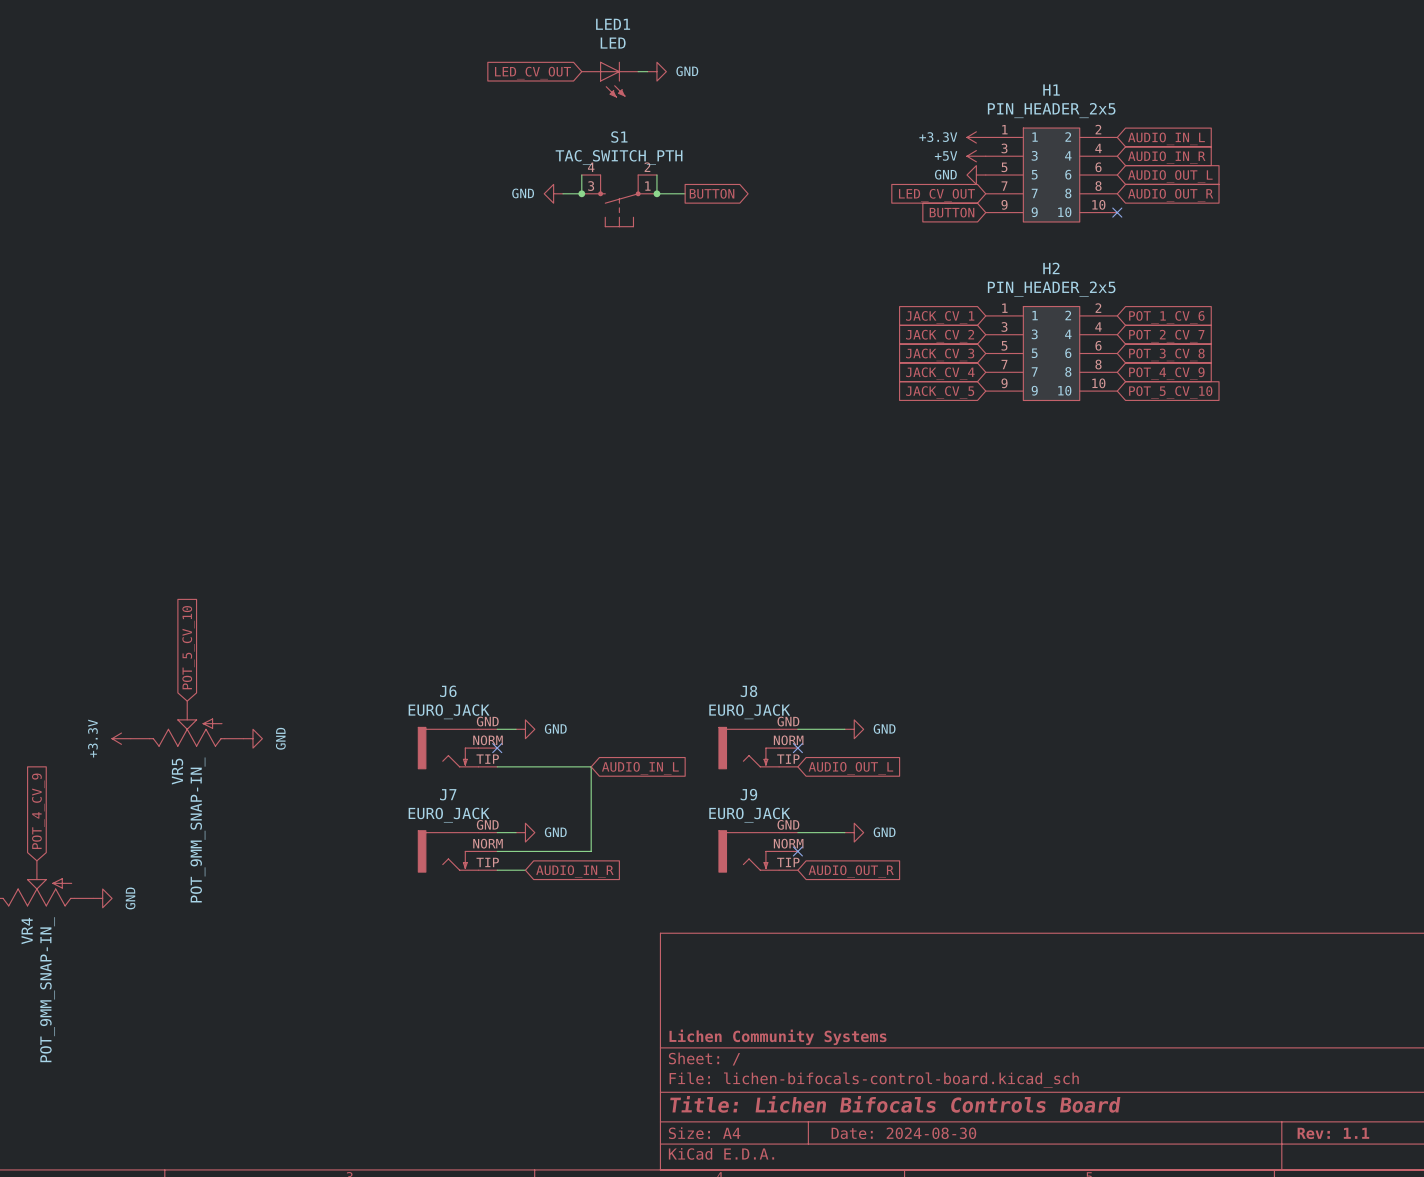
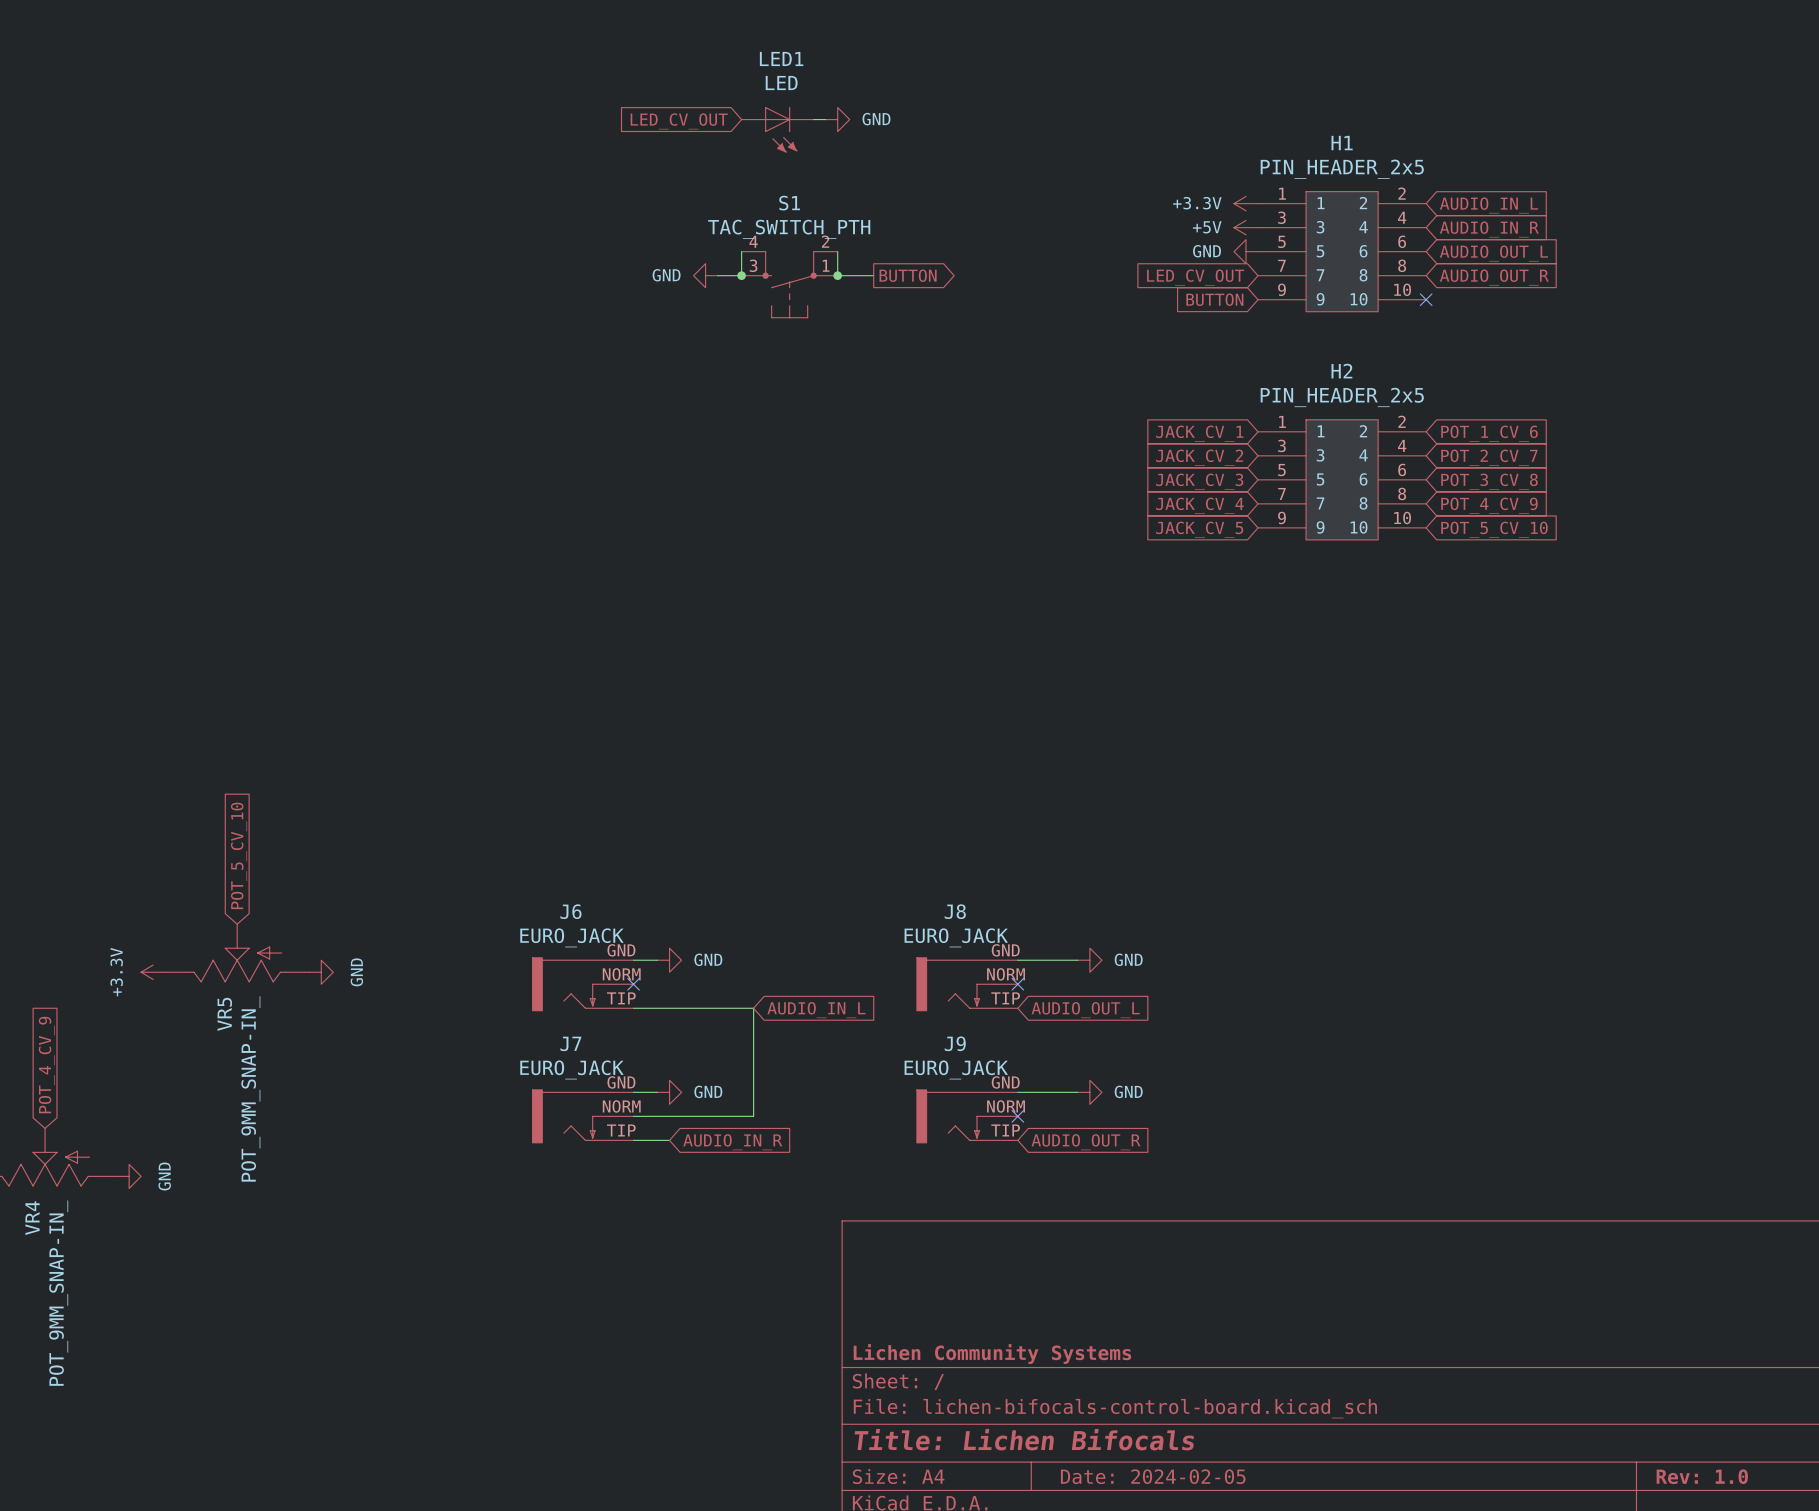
title block: Title: Lichen Bifocals Controls Board (895, 1104) -> Title: Lichen Bifocals (1024, 1439)
title block: Date: 2024-08-30 (903, 1133) -> Date: 2024-02-05 (1153, 1476)
title block: Rev: 1.1 (1333, 1133) -> Rev: 1.0 (1702, 1476)

